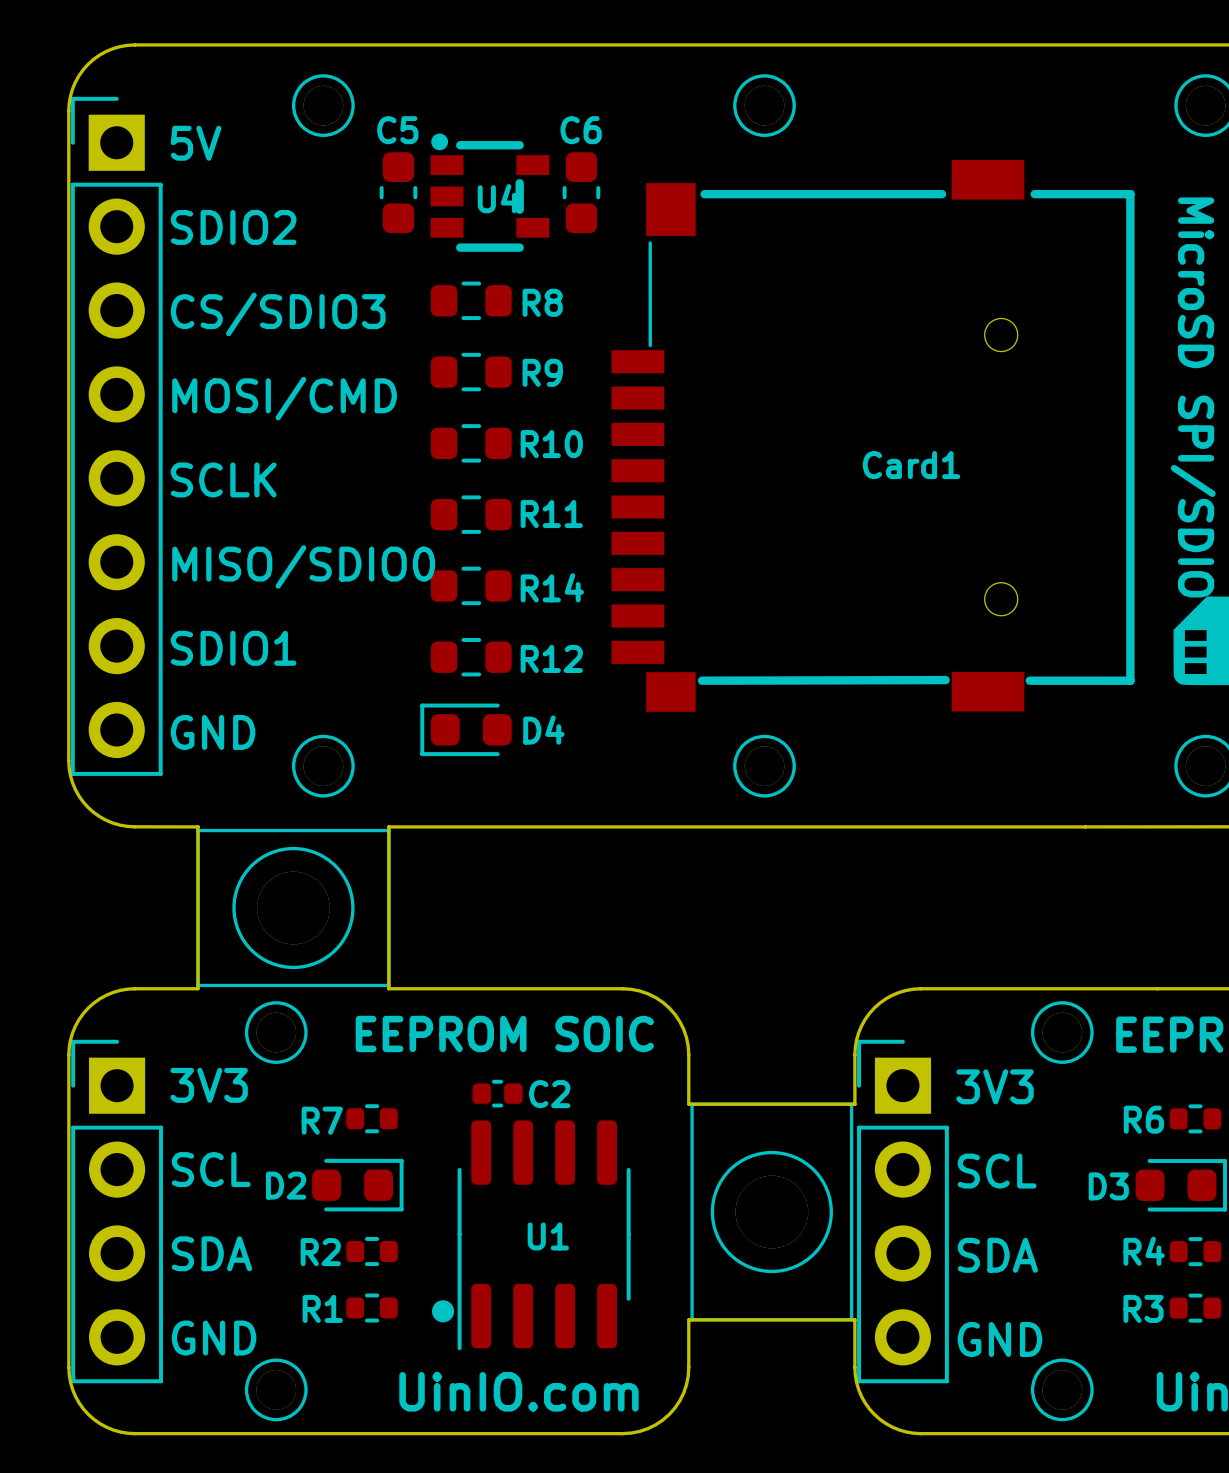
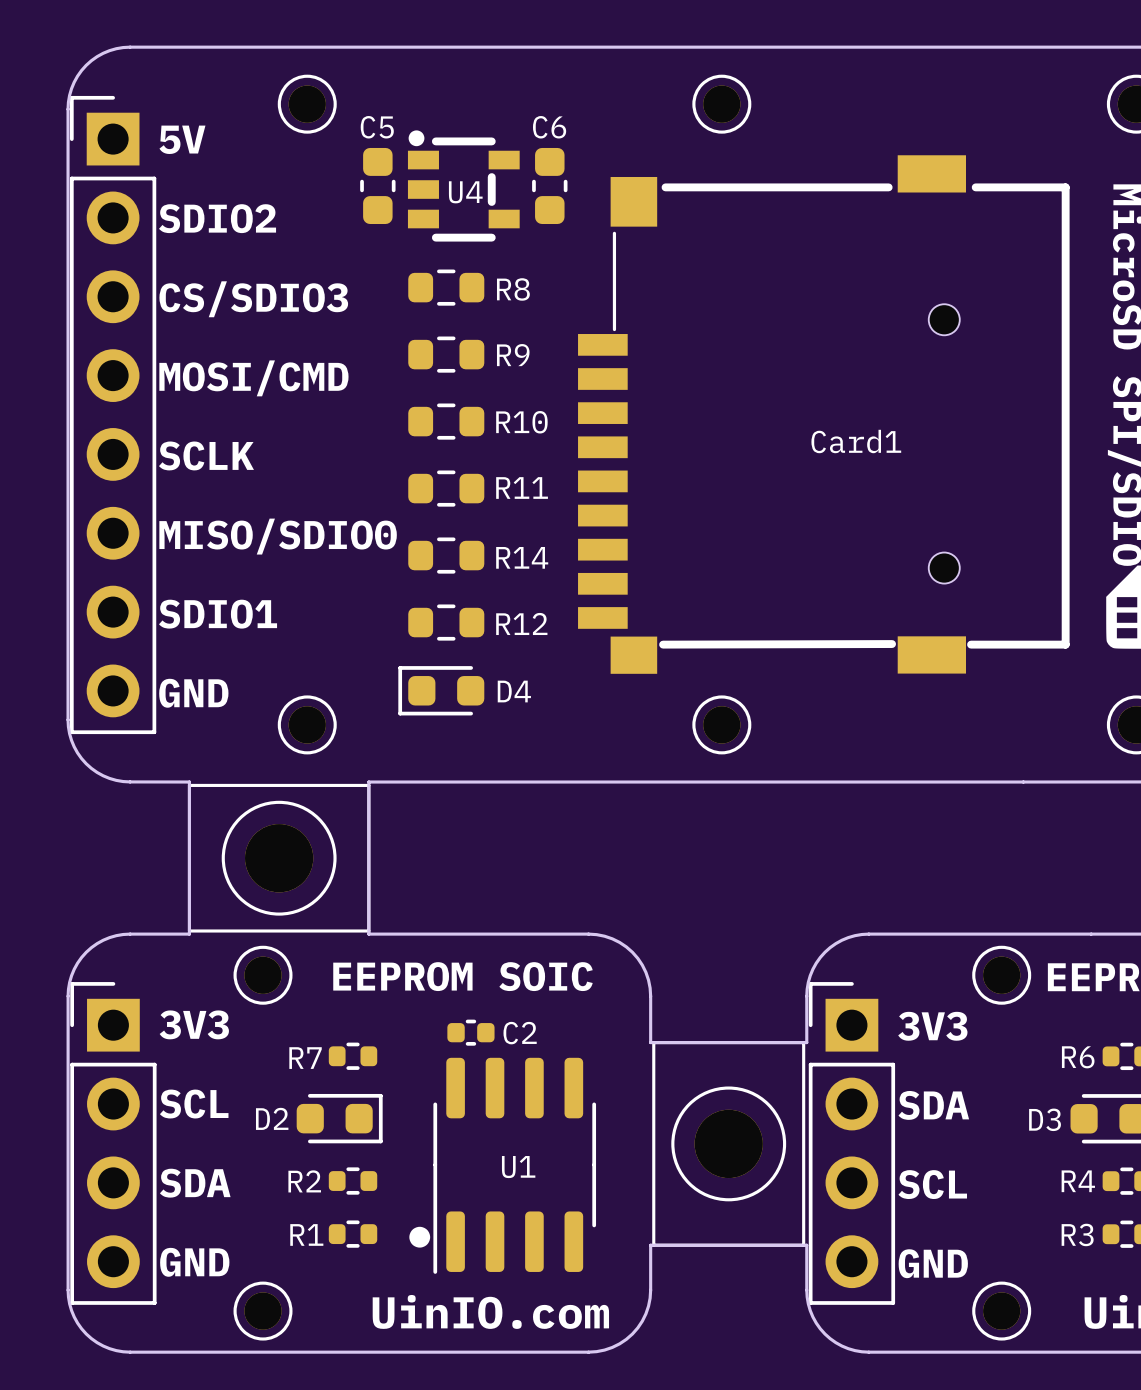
text: SCL (997, 1171) -> SDA (933, 1105)
text: SDA (997, 1255) -> SCL (932, 1184)

